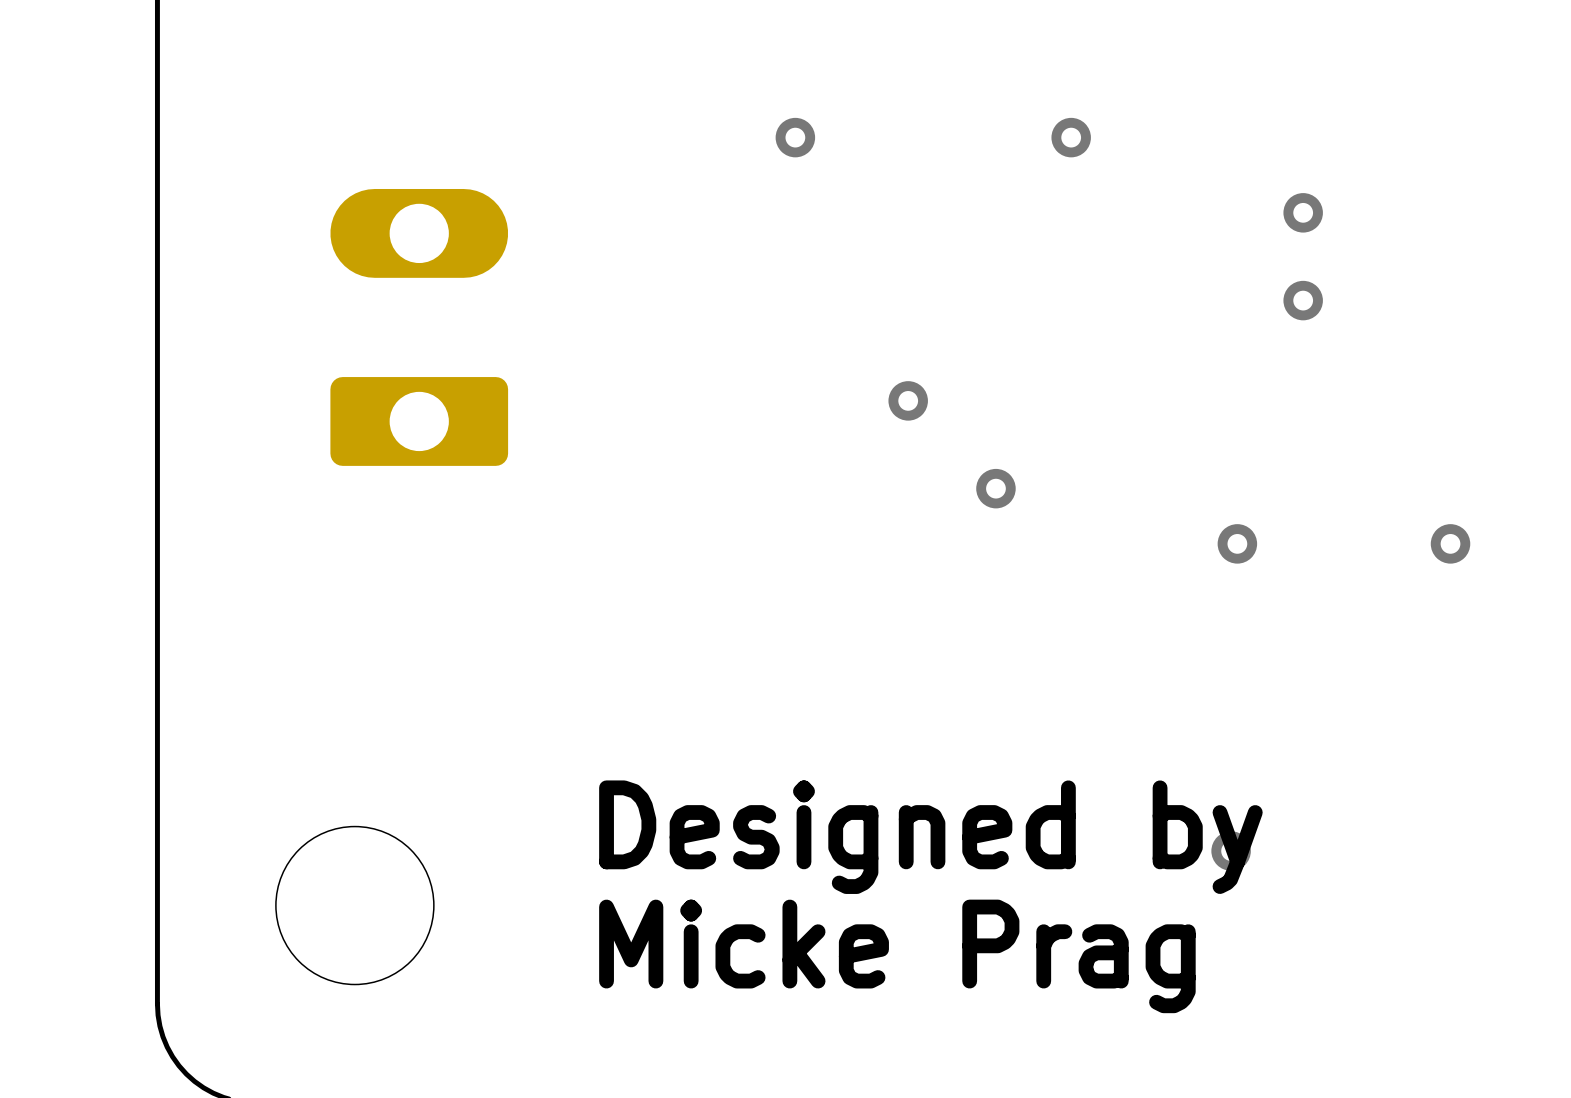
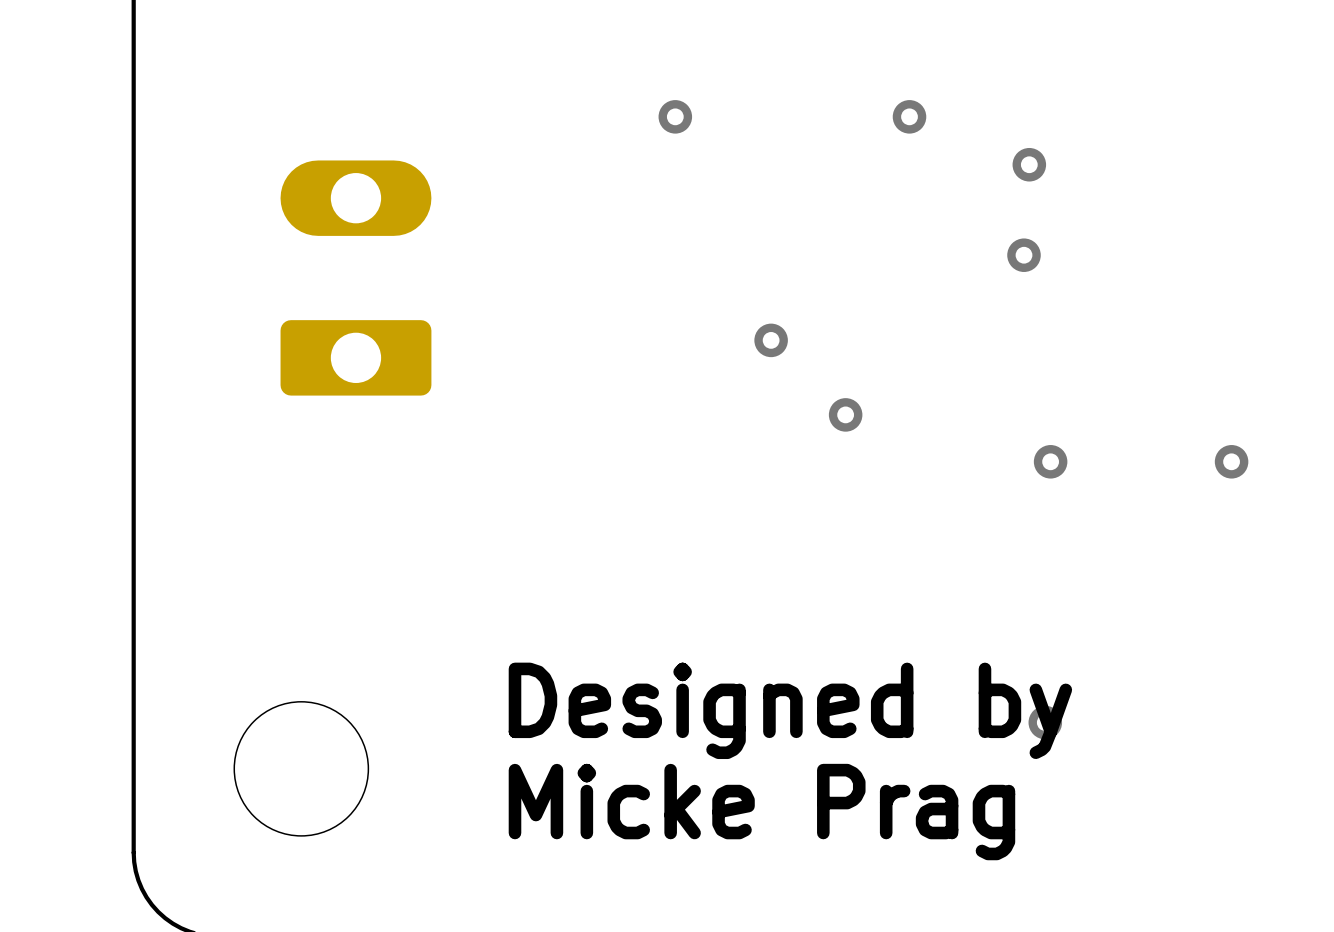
via: none -> (1029, 164)
via: (1303, 212) -> none
via: none -> (1024, 255)
via: (1303, 300) -> none

